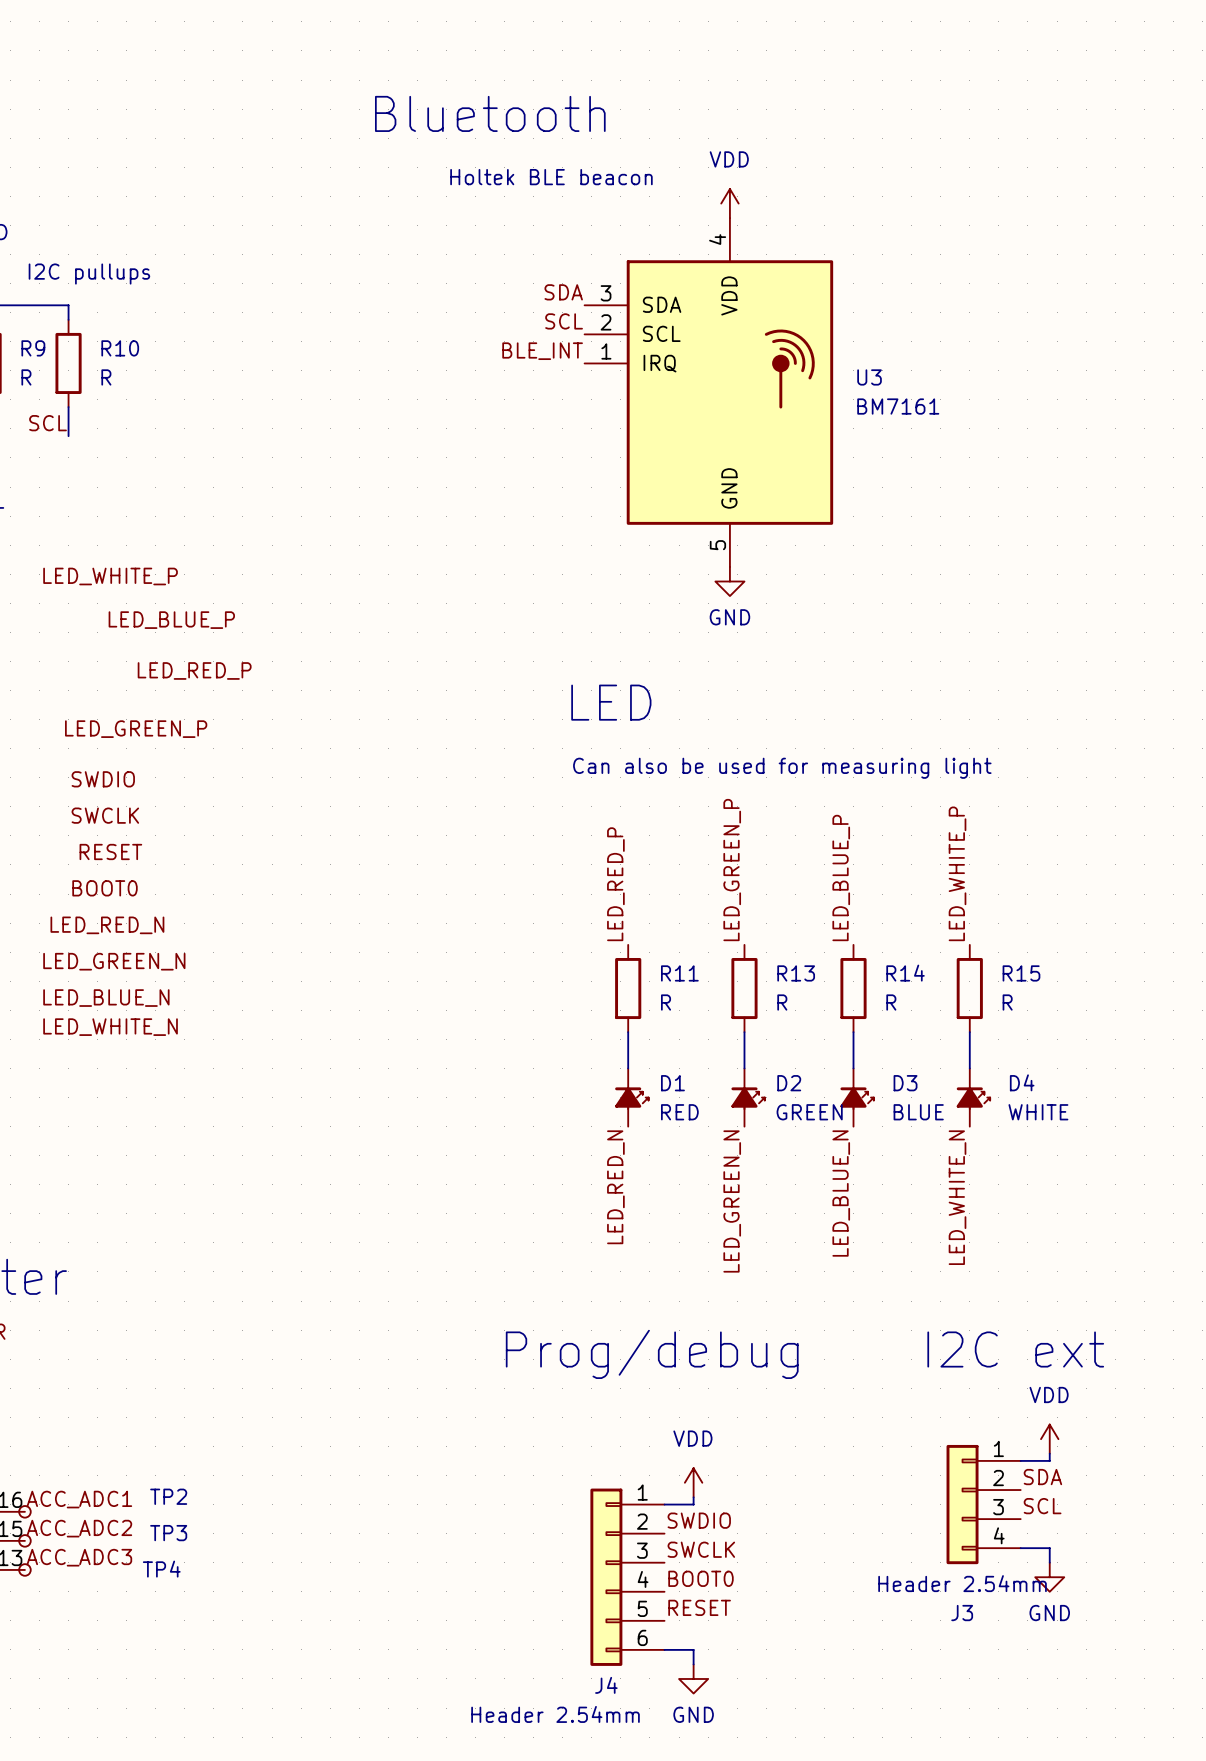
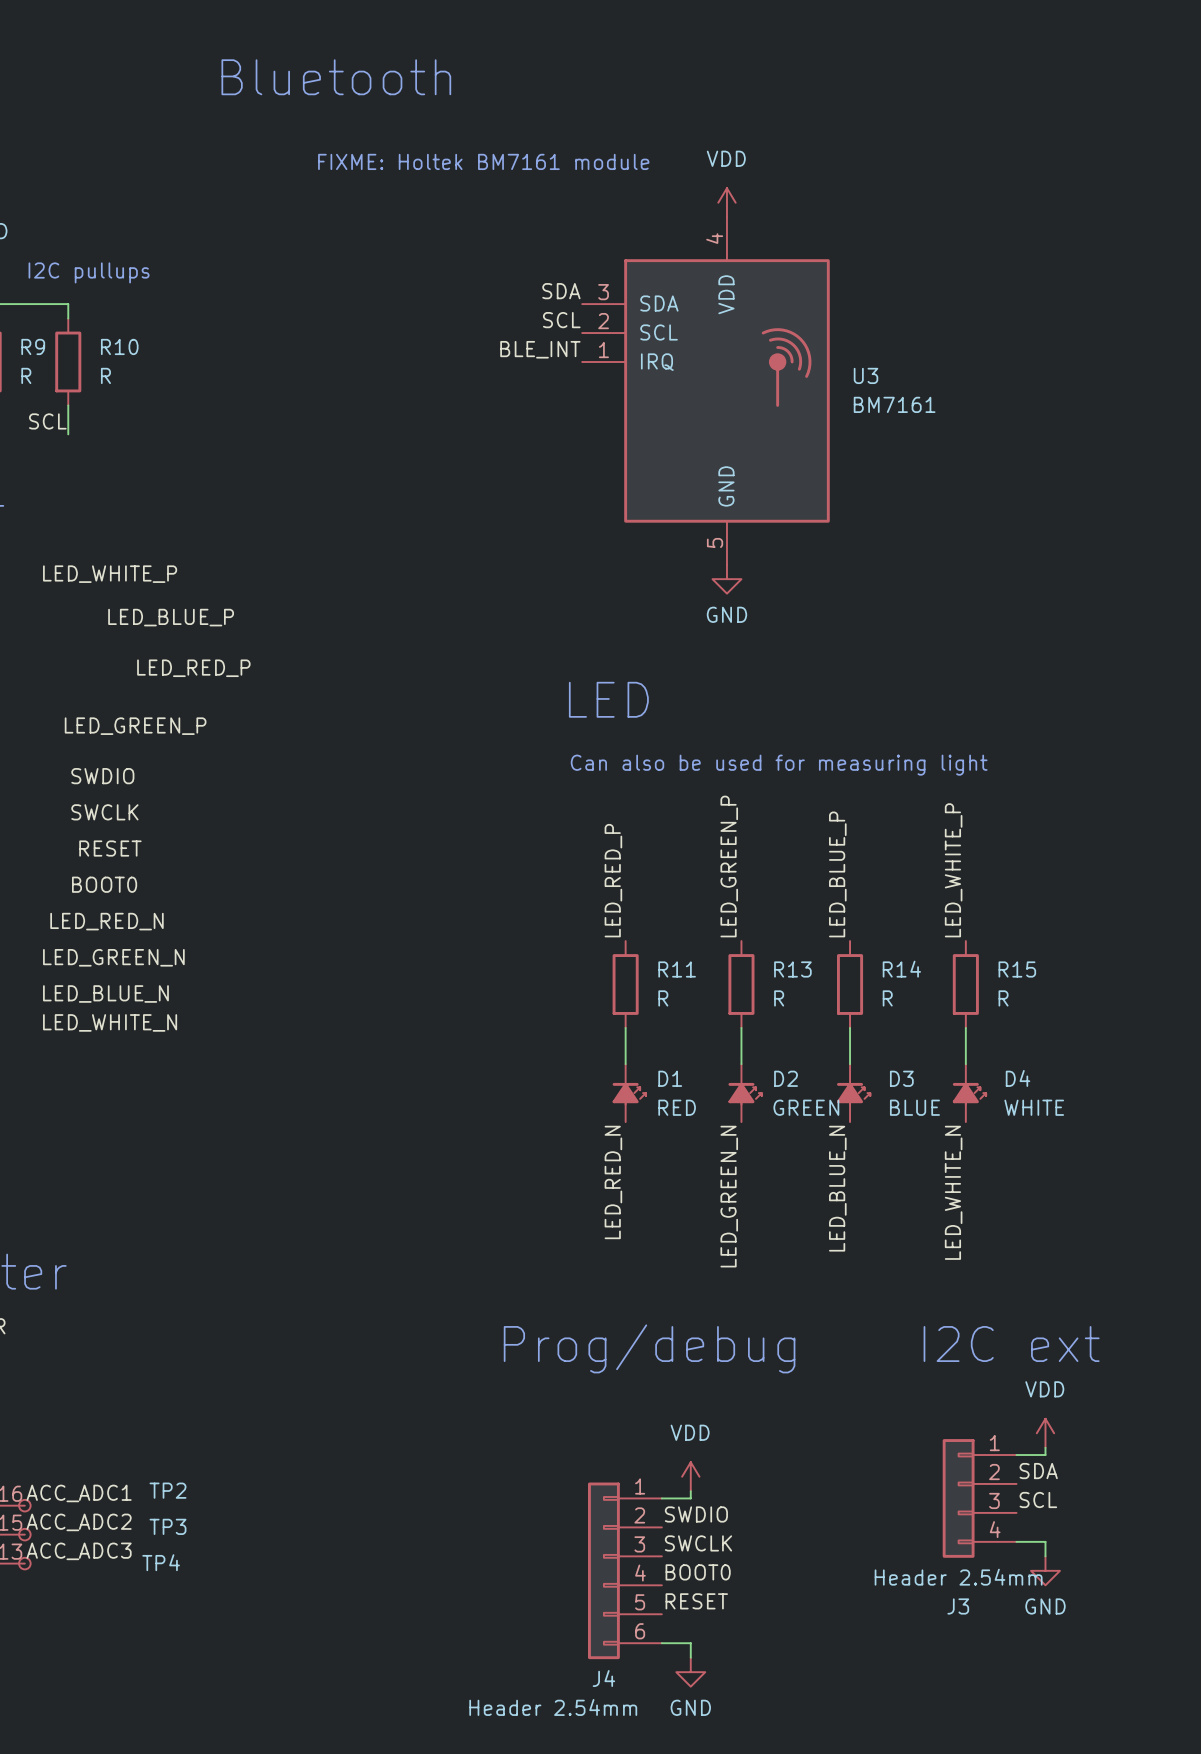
text position: Bluetooth (490, 113) -> Bluetooth (336, 77)
text: none -> FIXME: Holtek BM7161 module (483, 161)
text: Holtek BLE beacon (551, 177) -> none

